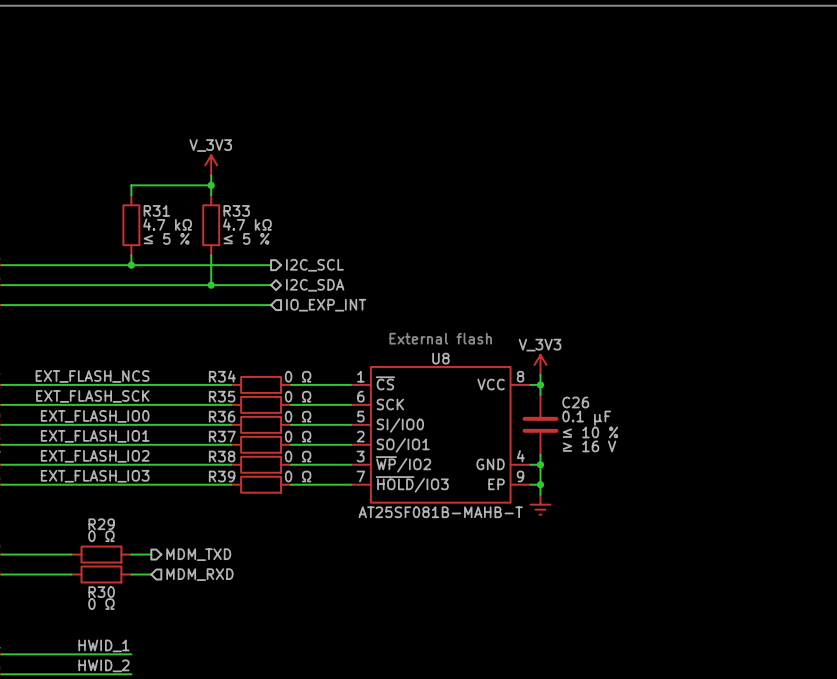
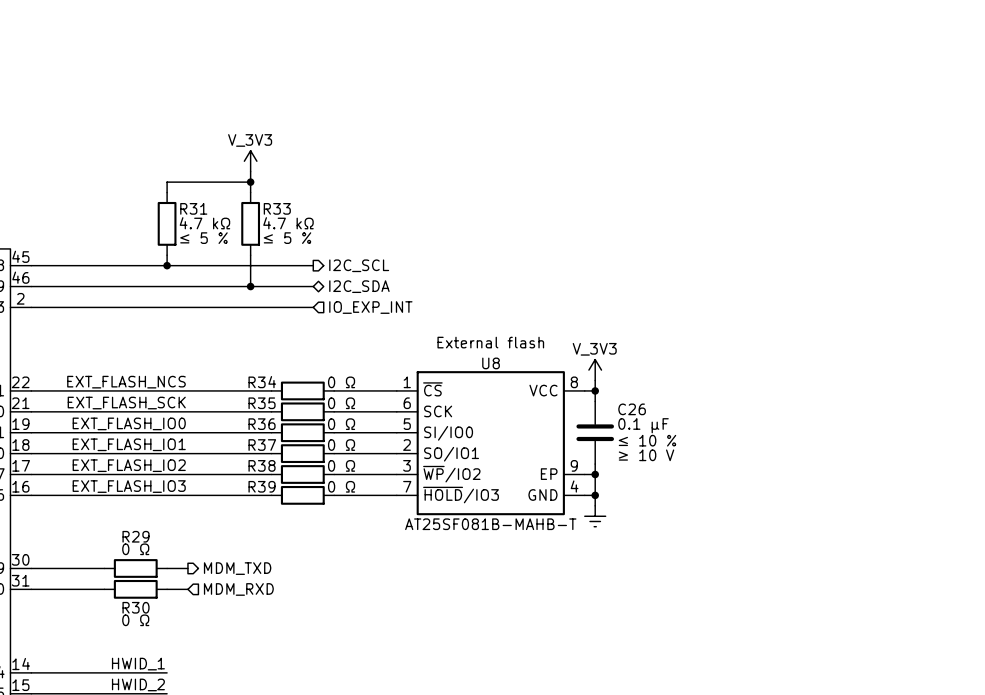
C26 text: ≥ 16 V (589, 446) -> ≥ 10 V (646, 455)
U8 pin number: 4 (520, 456) -> 9 (574, 465)
U8 pin name: GND (490, 464) -> EP (549, 474)
U8 pin number: 9 (520, 476) -> 4 (574, 486)
U8 pin name: EP (496, 484) -> GND (542, 494)

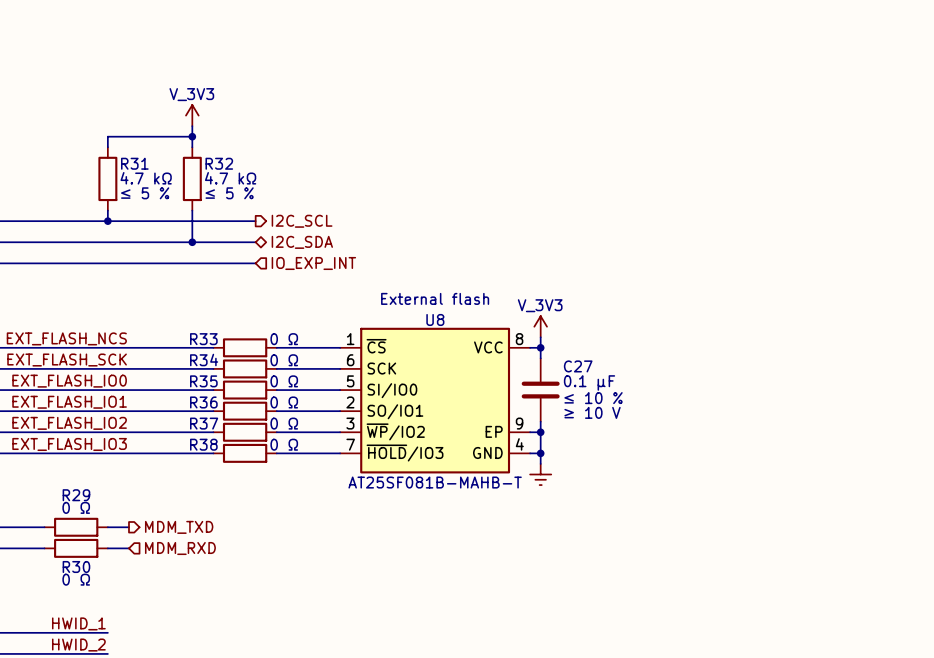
R33 name: R33 (277, 208) -> R32 (219, 163)
R34 name: R34 (262, 382) -> R33 (203, 339)
R35 name: R35 (262, 403) -> R34 (204, 360)
C26 name: C26 (632, 409) -> C27 (578, 366)
R36 name: R36 (262, 424) -> R35 (203, 381)
R37 name: R37 (262, 445) -> R36 (203, 402)
R38 name: R38 (262, 465) -> R37 (204, 423)
R39 name: R39 (262, 486) -> R38 (203, 444)

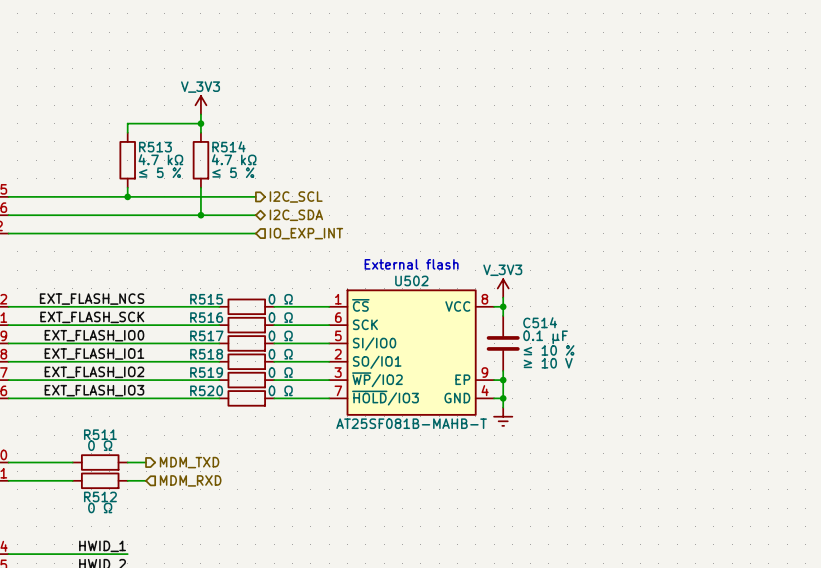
R31 name: R31 (134, 163) -> R513 (155, 147)
R32 name: R32 (219, 163) -> R514 (228, 146)
U8 name: U8 (435, 319) -> U502 (411, 280)
R33 name: R33 (203, 339) -> R515 (206, 299)
R34 name: R34 (204, 360) -> R516 (206, 317)
C27 name: C27 (578, 366) -> C514 (540, 322)
R35 name: R35 (203, 381) -> R517 (206, 335)
R36 name: R36 (203, 402) -> R518 (206, 354)
R37 name: R37 (204, 423) -> R519 (206, 372)
R38 name: R38 (203, 444) -> R520 (206, 390)
R29 name: R29 (76, 495) -> R511 (100, 434)
R30 name: R30 (76, 567) -> R512 (100, 496)

